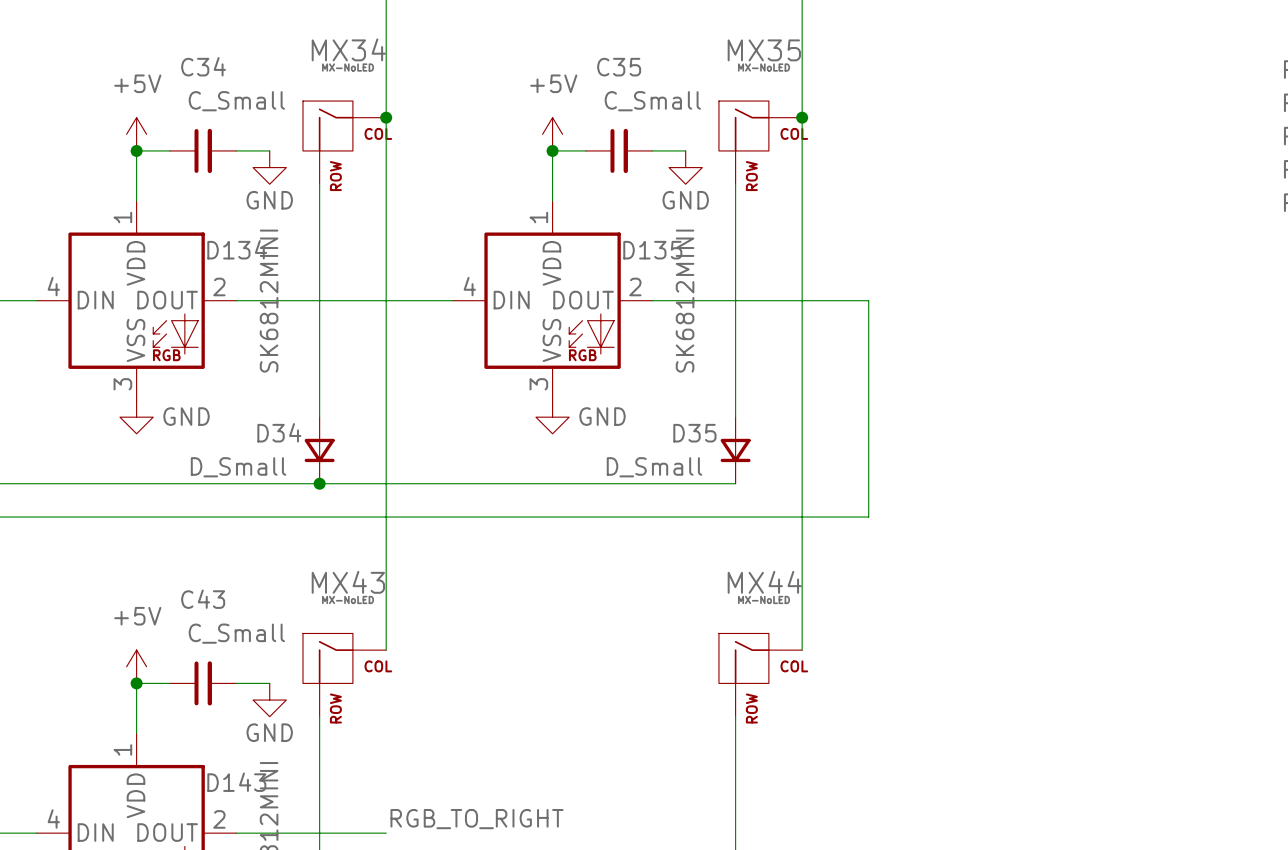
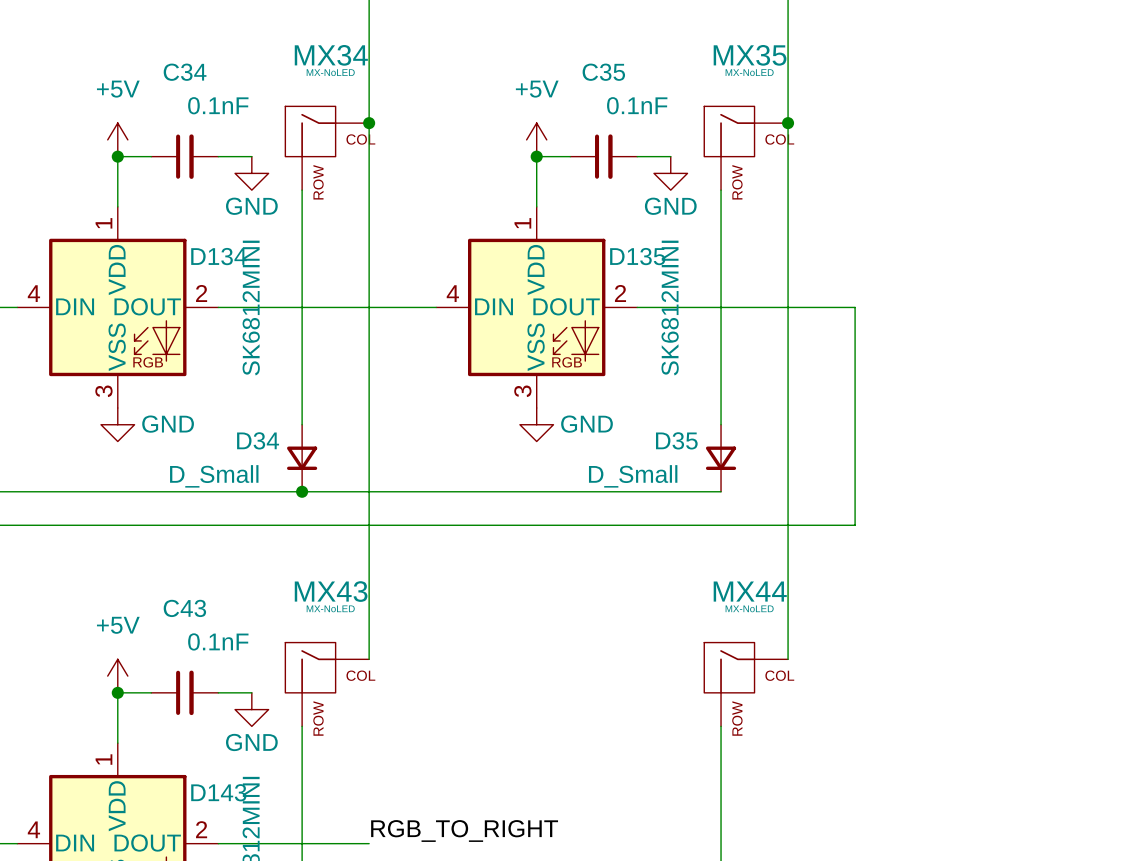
C34 value: C_Small (236, 101) -> 0.1nF (218, 105)
C35 value: C_Small (652, 101) -> 0.1nF (637, 105)
C43 value: C_Small (236, 633) -> 0.1nF (218, 641)

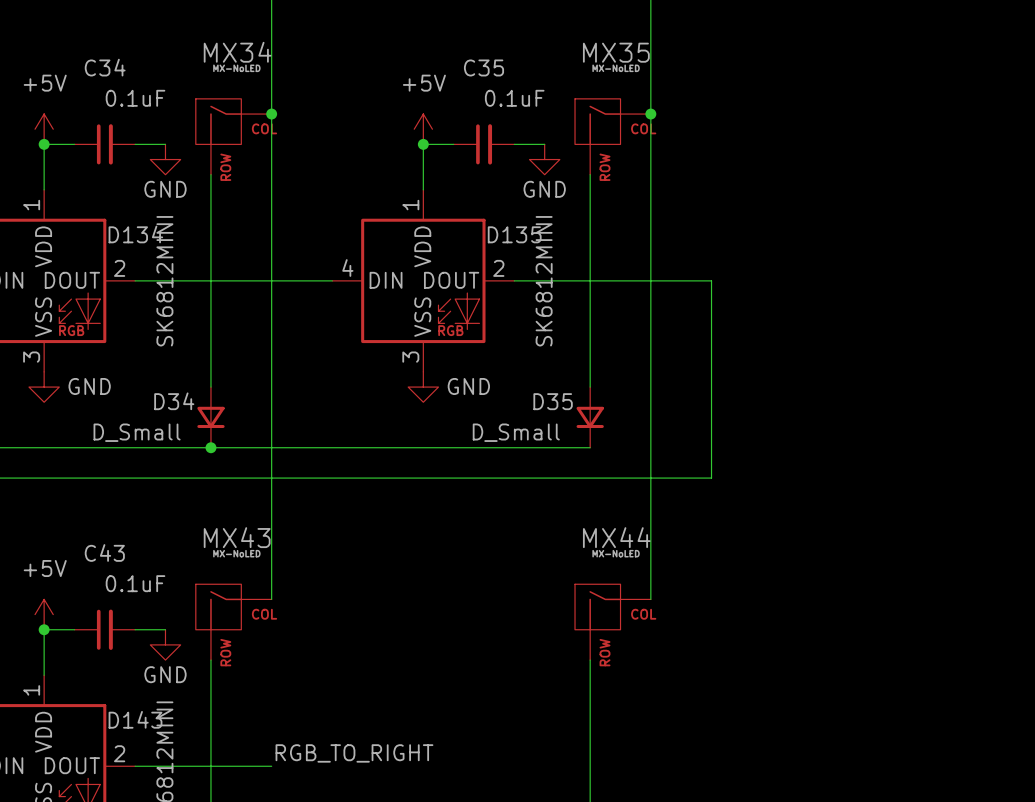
C34 value: 0.1nF (218, 105) -> 0.1uF (135, 98)
C35 value: 0.1nF (637, 105) -> 0.1uF (514, 98)
C43 value: 0.1nF (218, 641) -> 0.1uF (135, 583)

